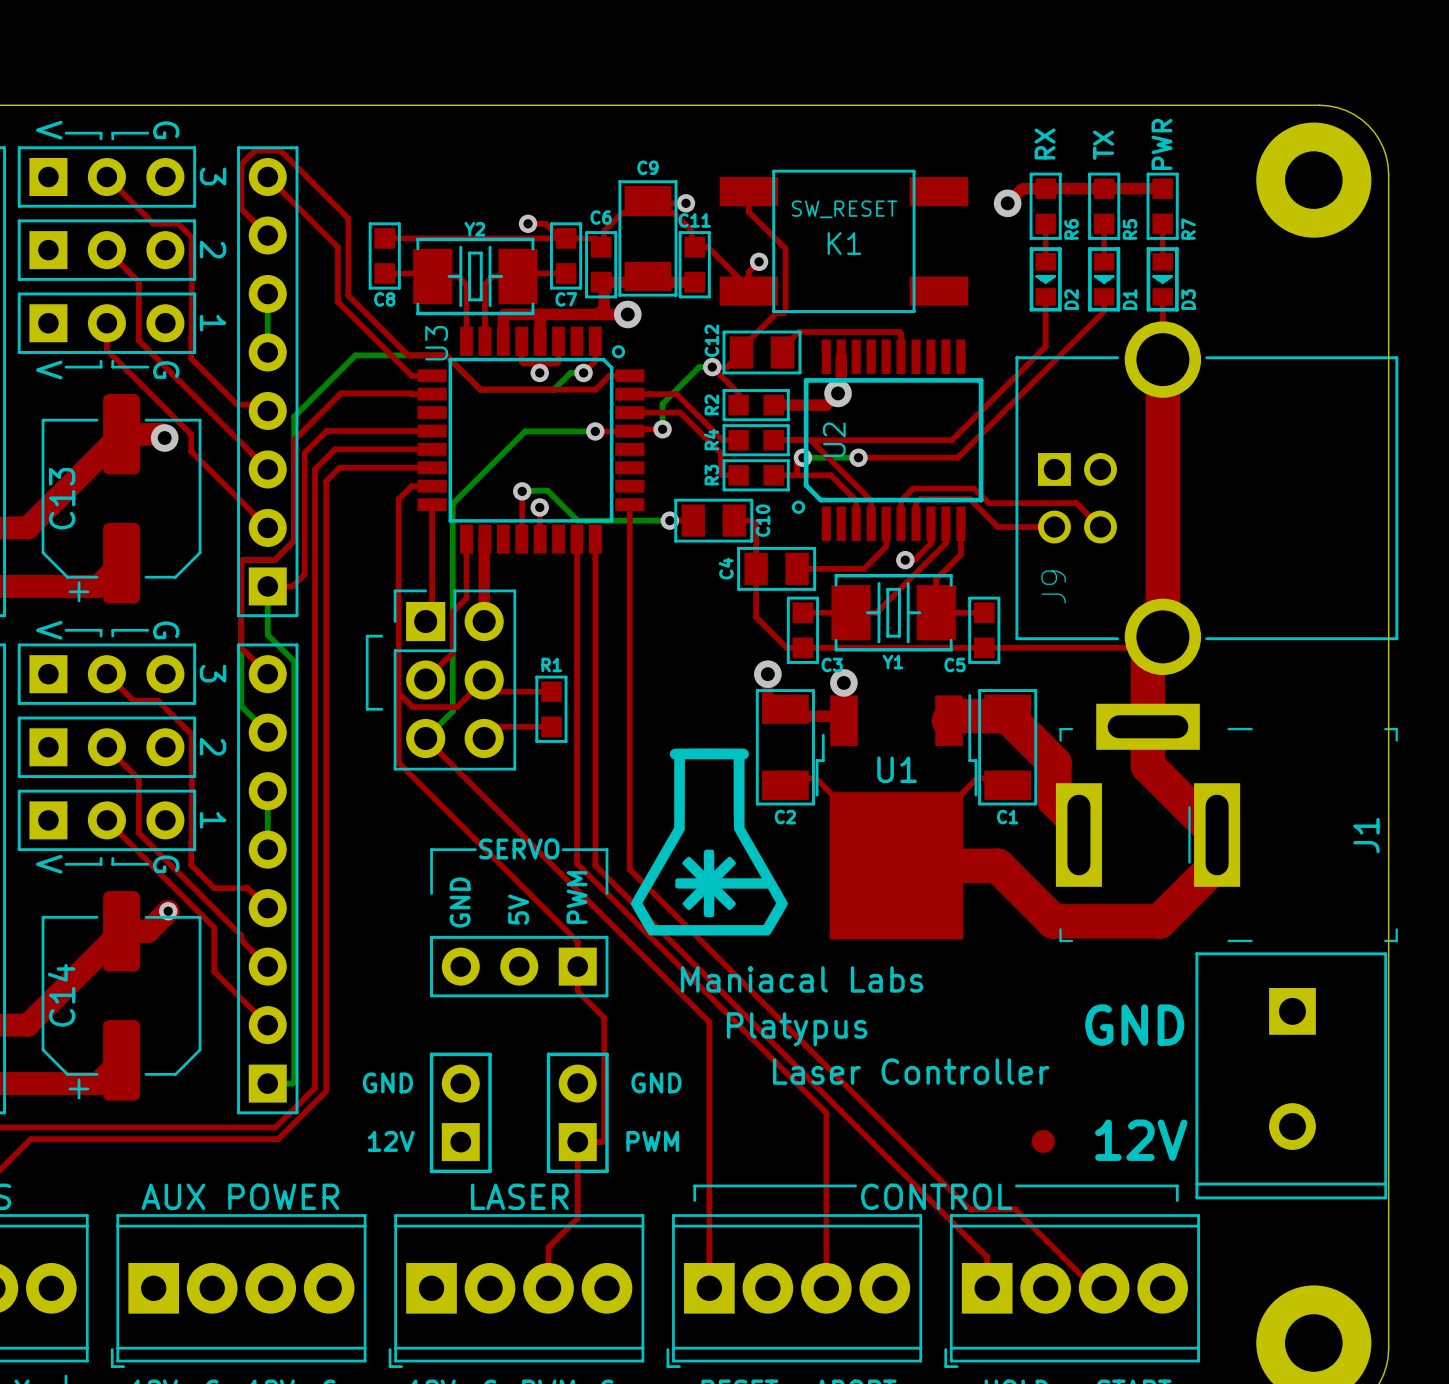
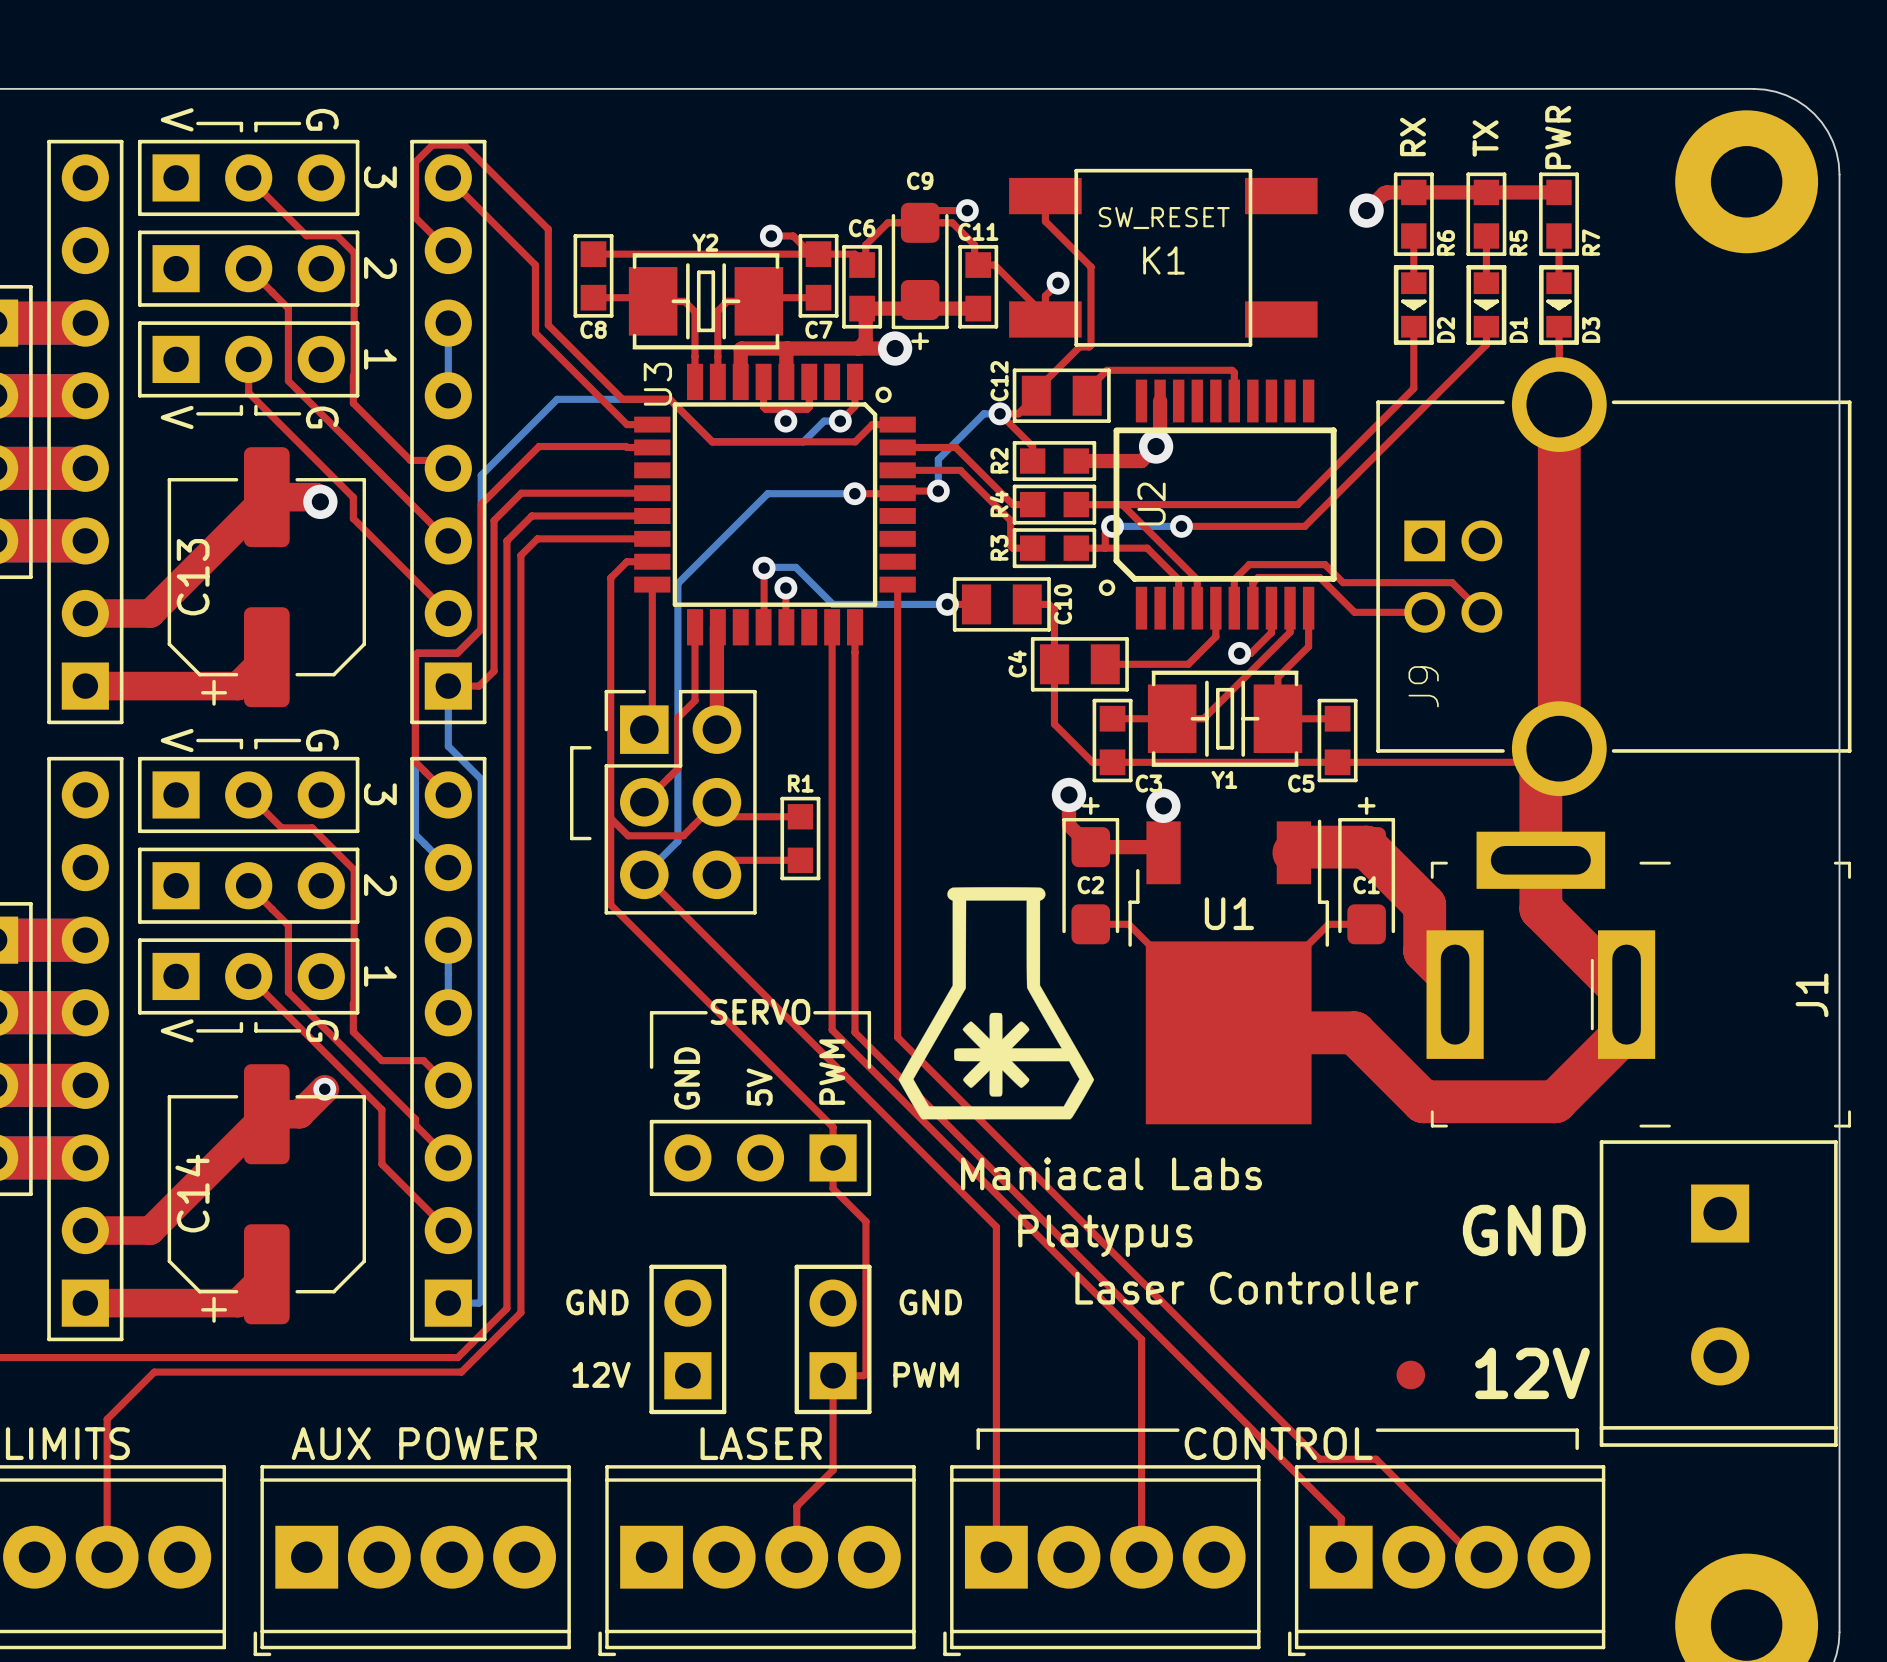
C9 footprint: [618, 180, 678, 297] -> [891, 202, 949, 330]
line: none -> (920, 334) (920, 348)
line: none -> (912, 341) (927, 341)
line: none -> (1090, 798) (1090, 813)
line: none -> (1366, 798) (1366, 813)
line: none -> (1083, 805) (1098, 805)
line: none -> (1359, 805) (1373, 805)
C2 footprint: [755, 689, 815, 806] -> [1062, 817, 1120, 945]
C1 footprint: [978, 689, 1038, 806] -> [1338, 817, 1396, 945]
C2 name position: C2 (785, 817) -> C2 (1090, 885)
C1 name position: C1 (1007, 817) -> C1 (1366, 885)

